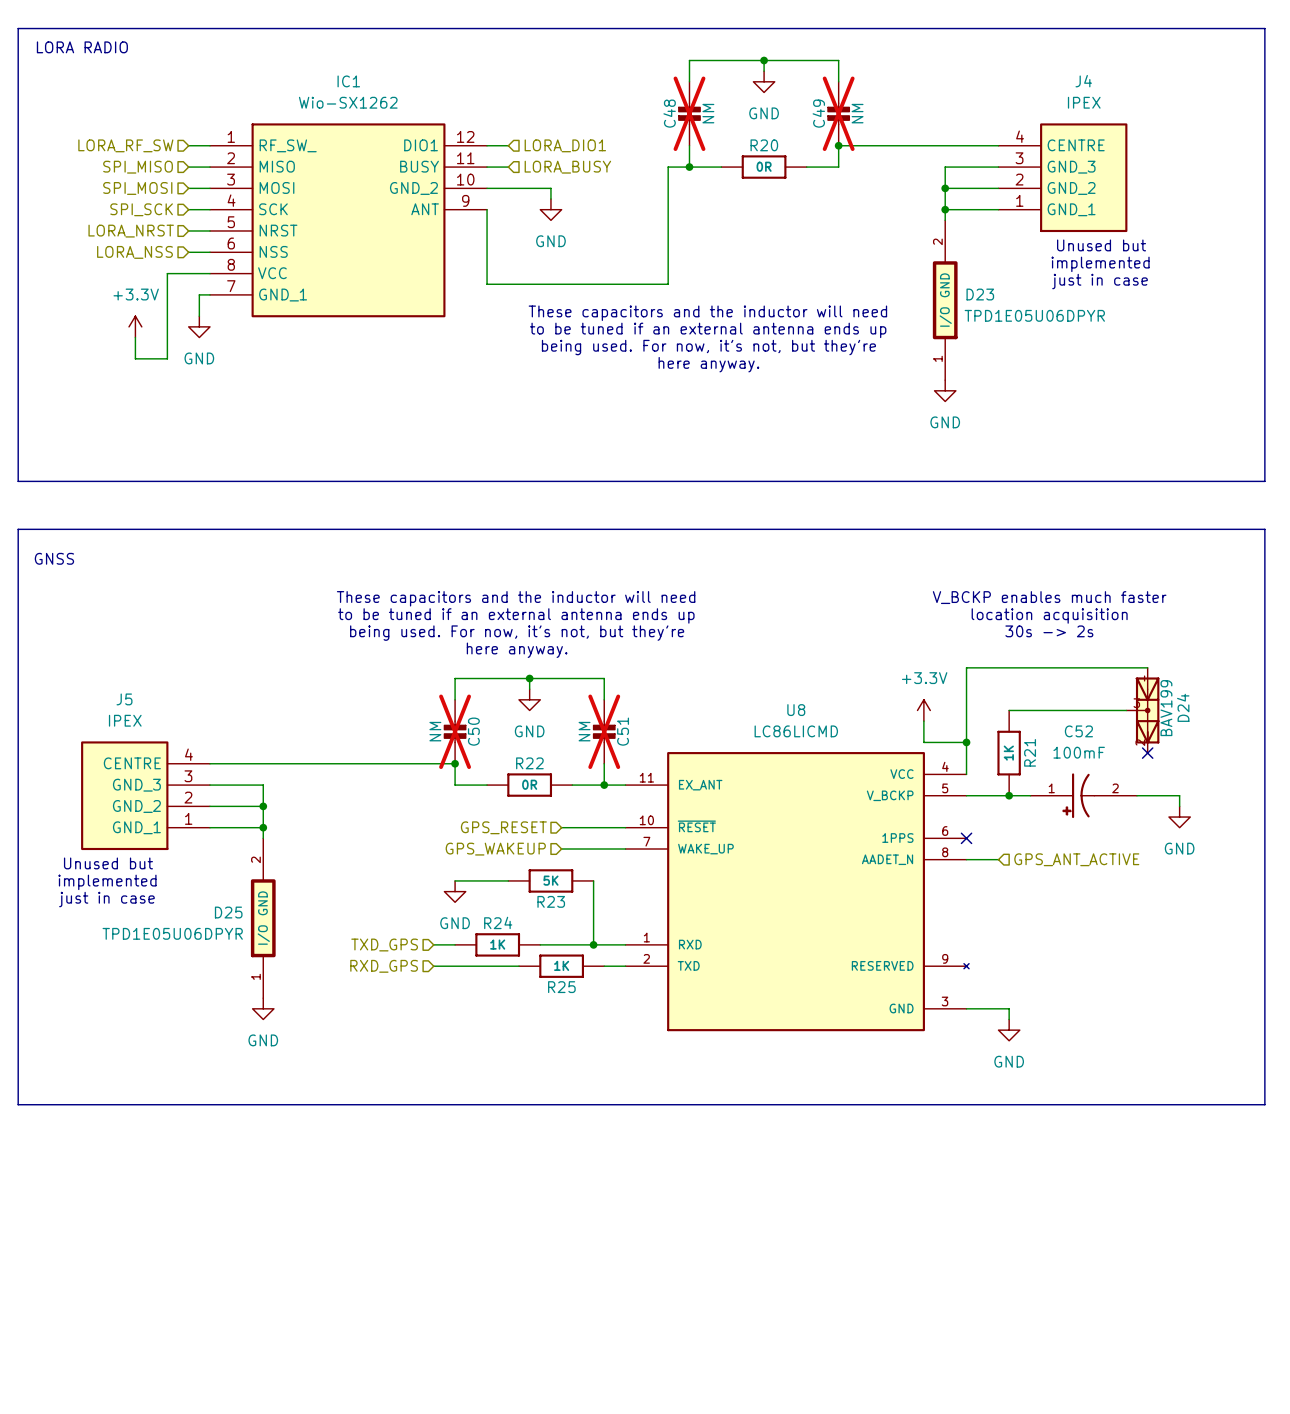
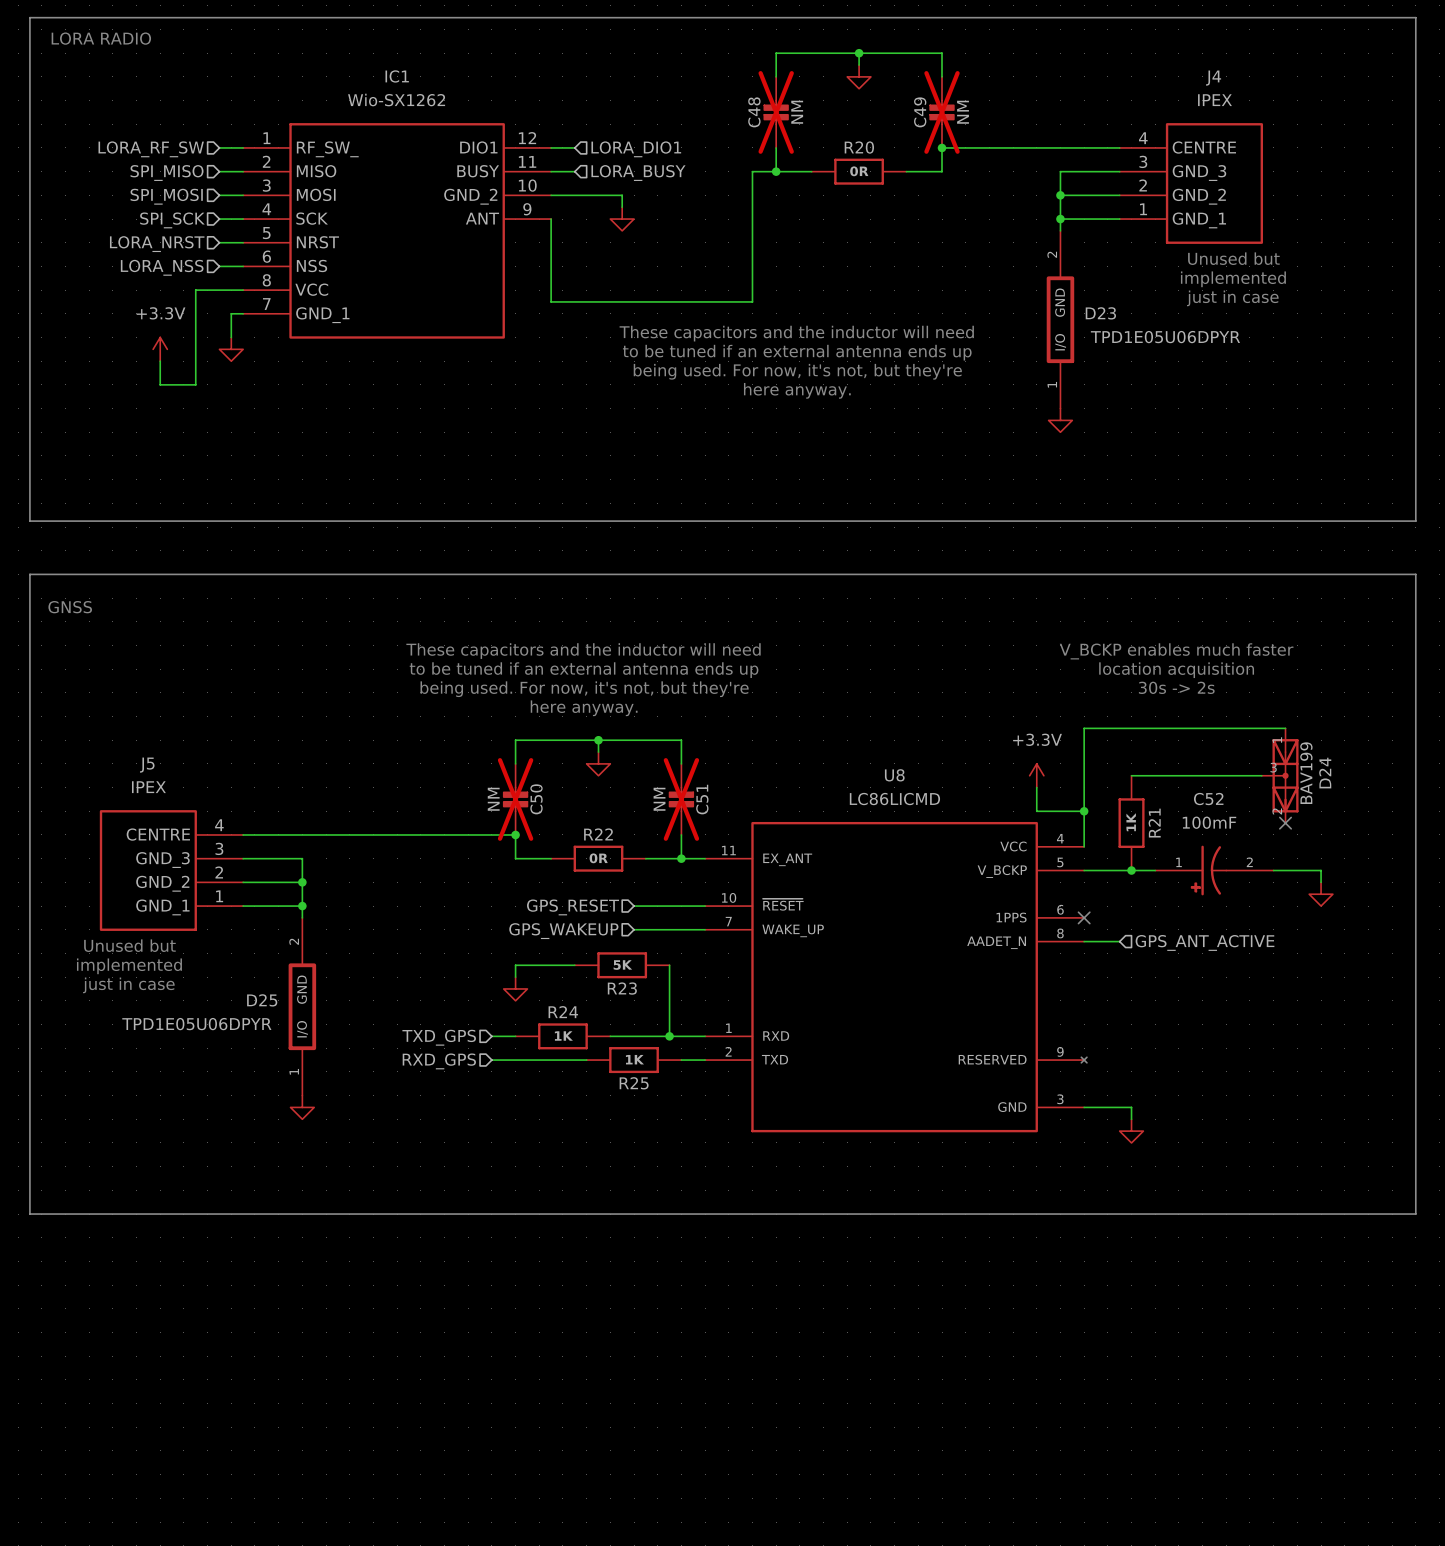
power symbol text: GND (764, 113) -> none
power symbol text: GND (550, 241) -> none
power symbol text: GND (199, 358) -> none
power symbol text: GND (945, 422) -> none
power symbol text: GND (529, 731) -> none
power symbol text: GND (1179, 848) -> none
power symbol: GND (455, 891) -> none
power symbol: none -> (515, 988)
power symbol text: GND (263, 1040) -> none
power symbol text: GND (1009, 1061) -> none

